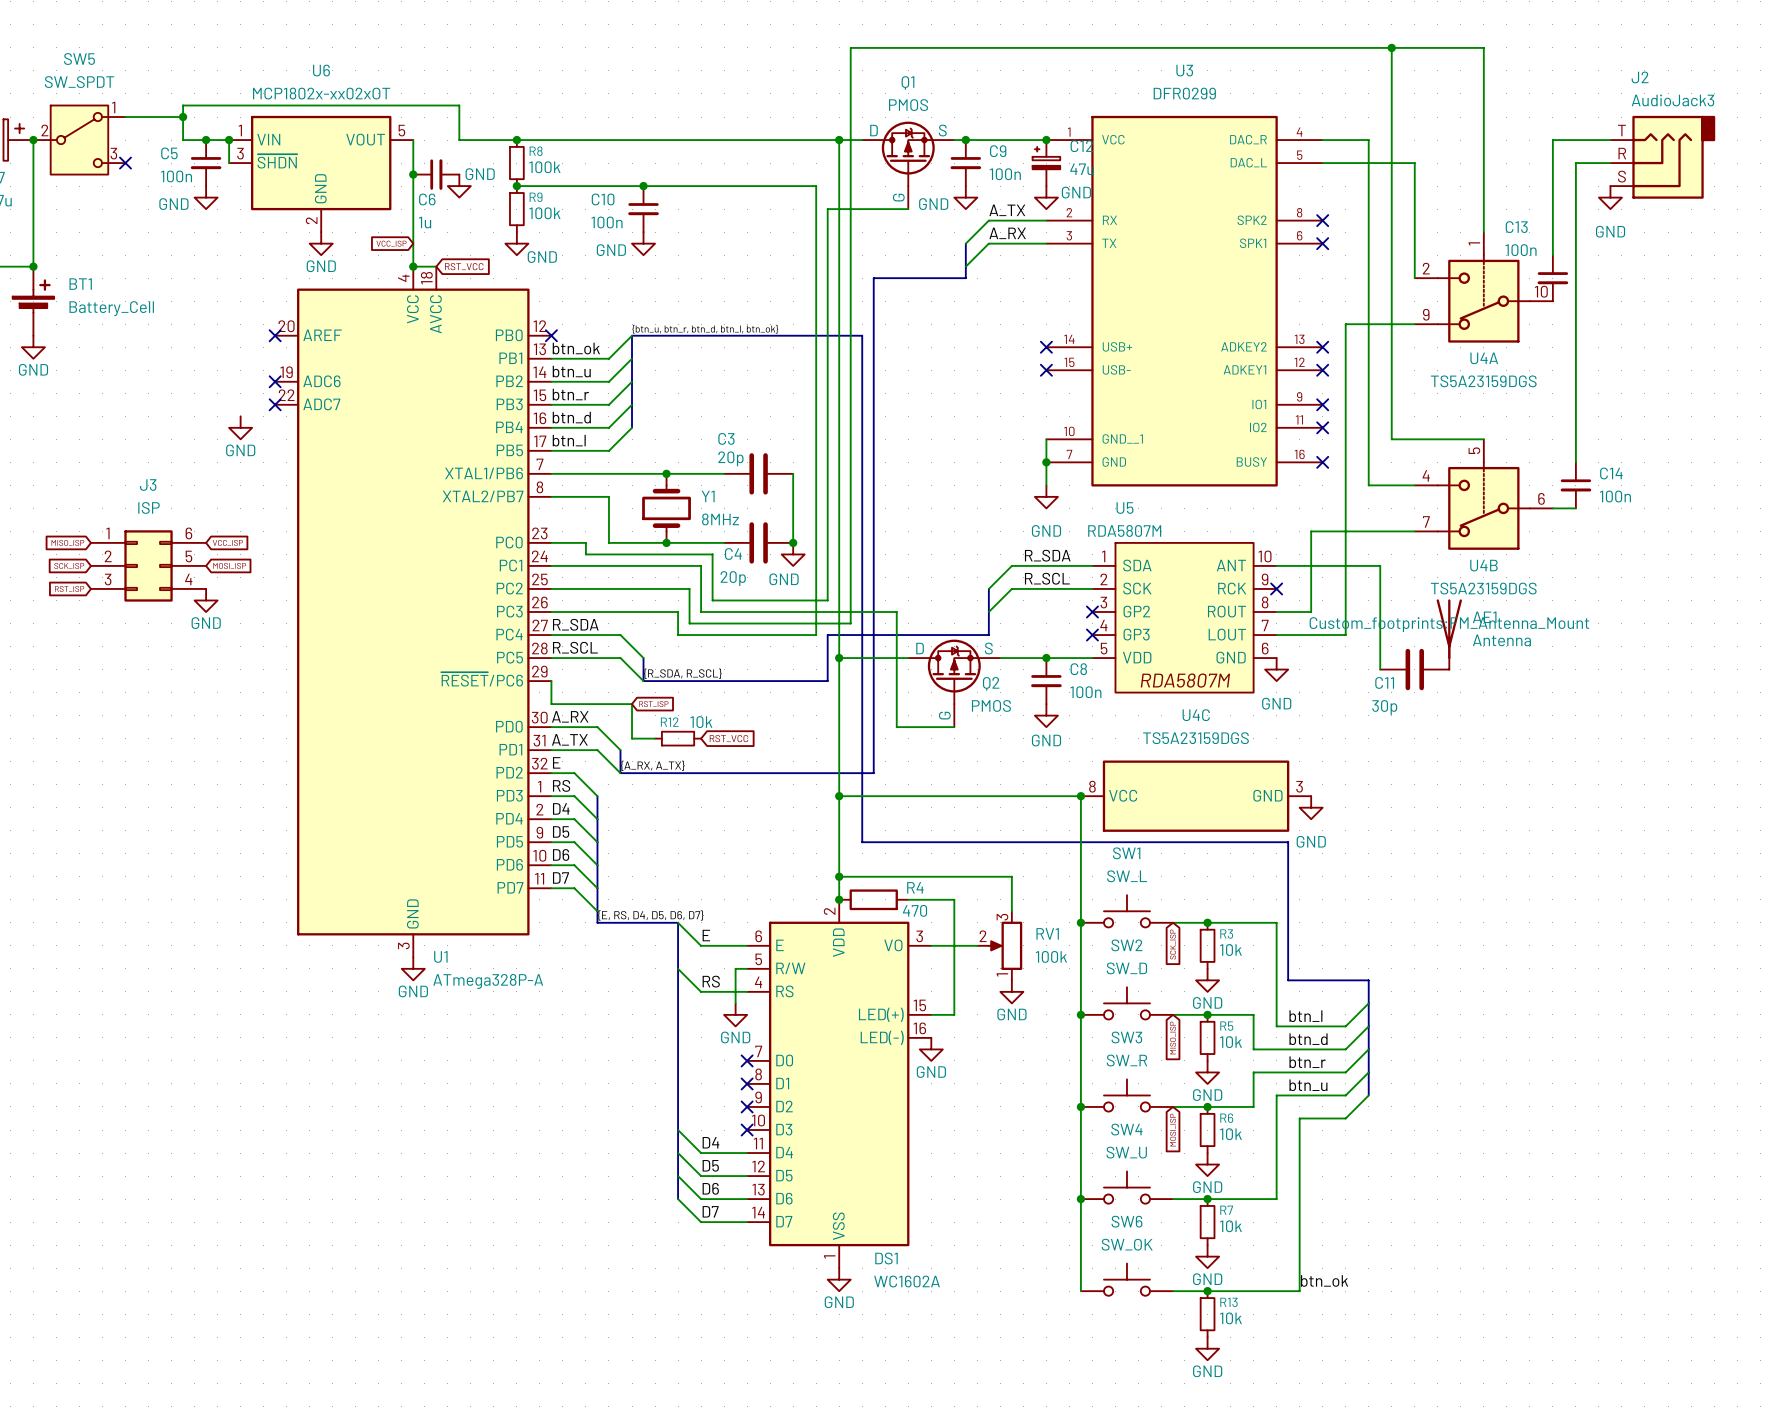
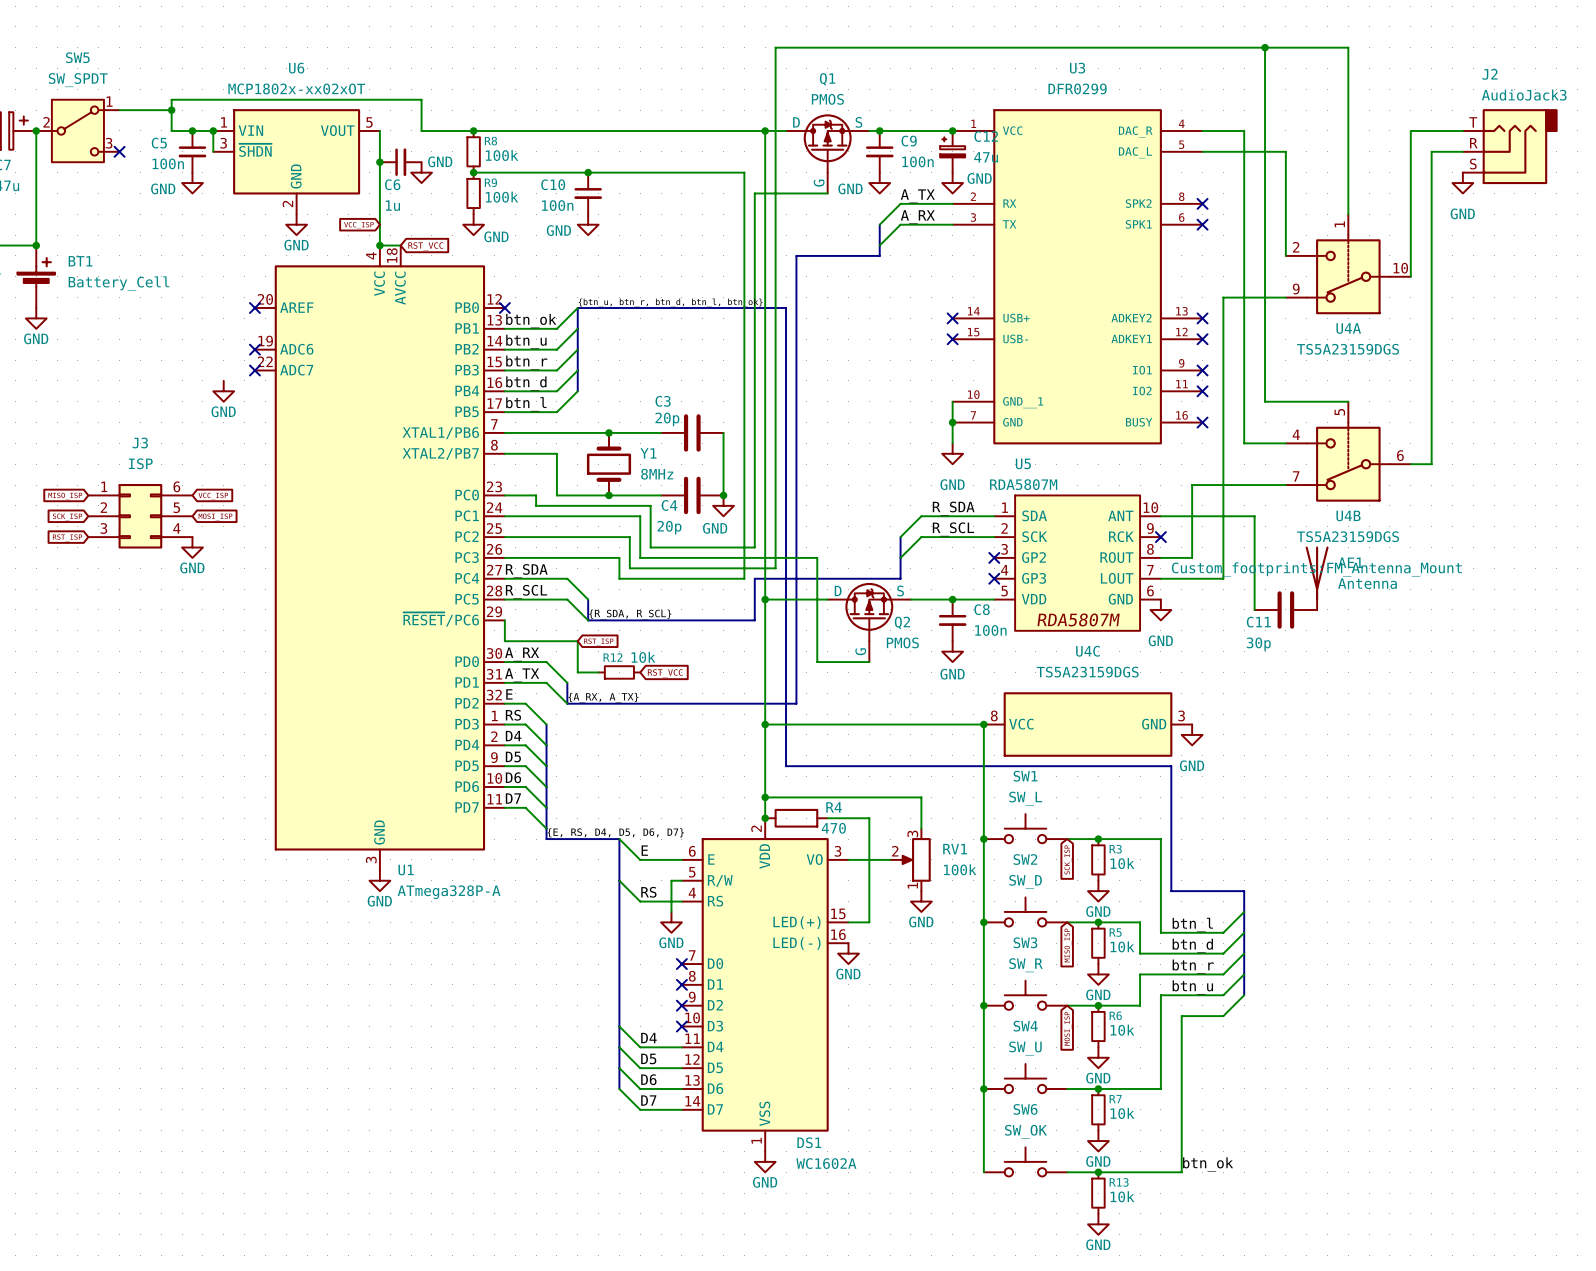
C13: 100n (1552, 278) -> none
C14: 100n (1575, 485) -> none

